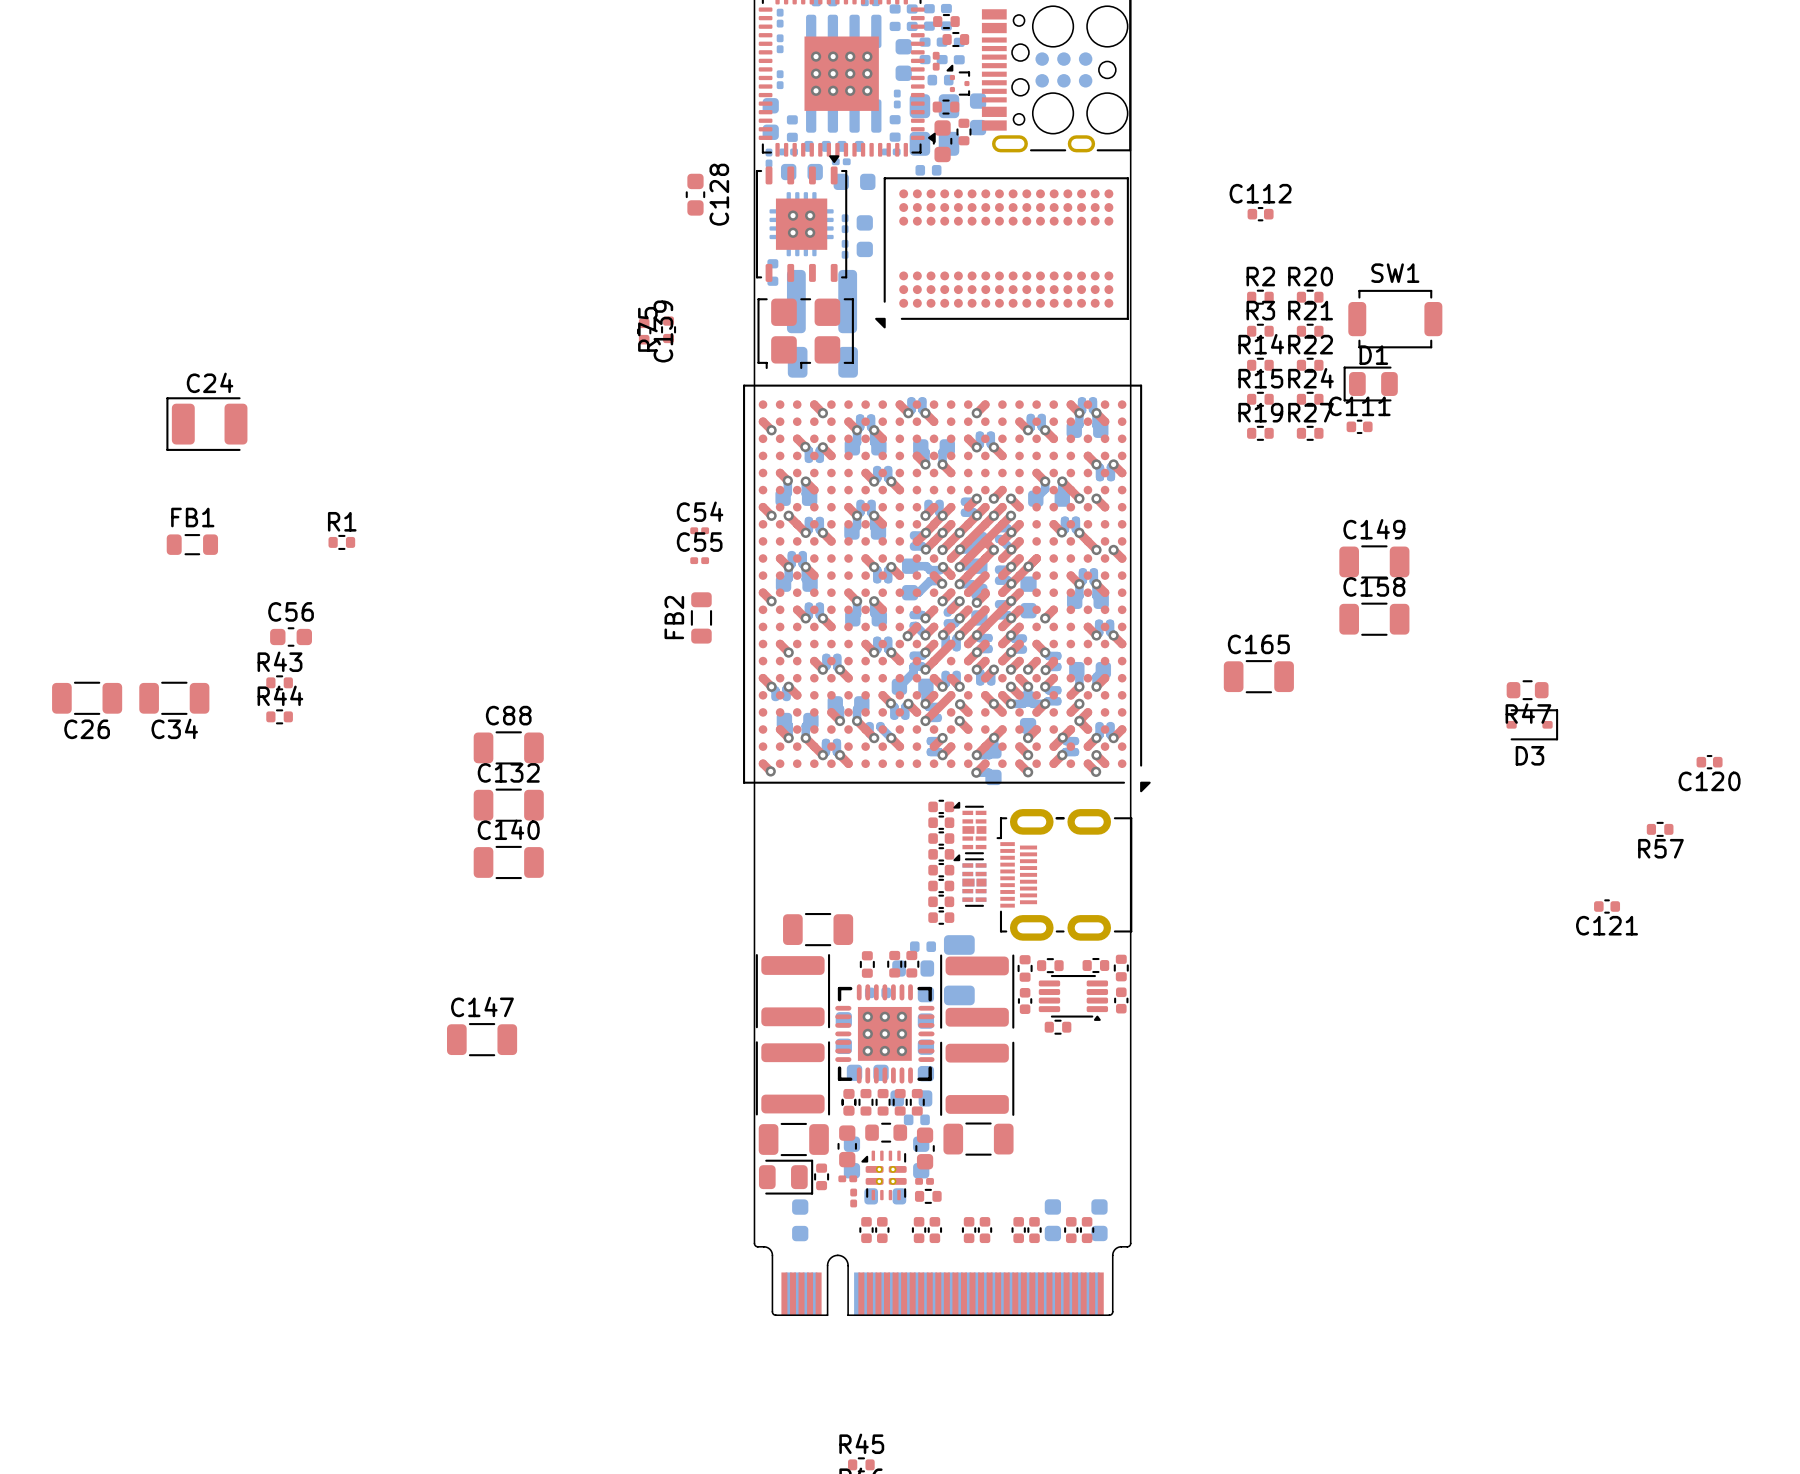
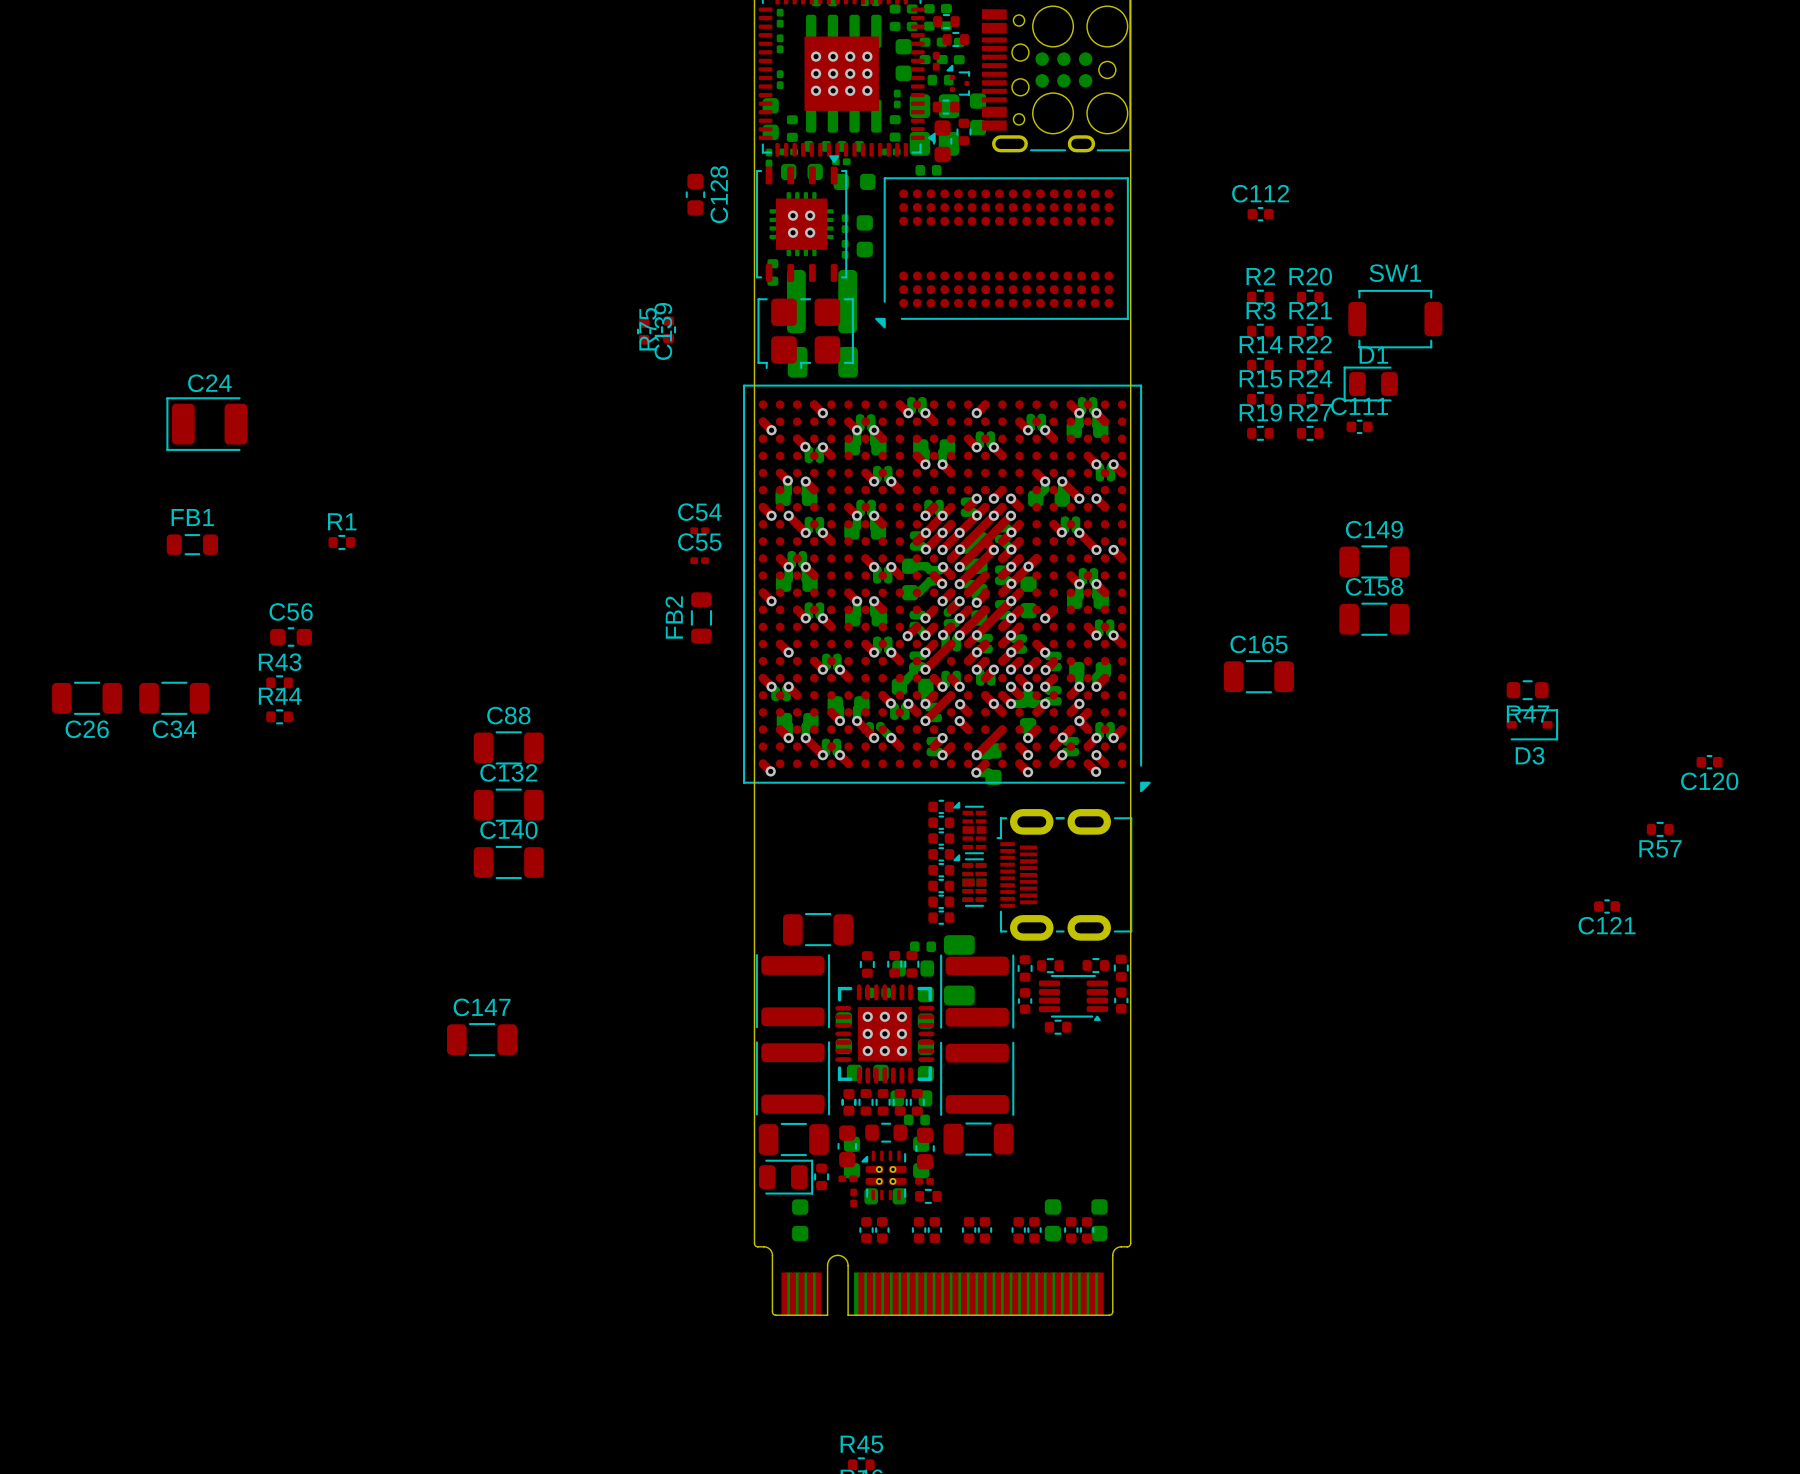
via: (994, 737) -> none

